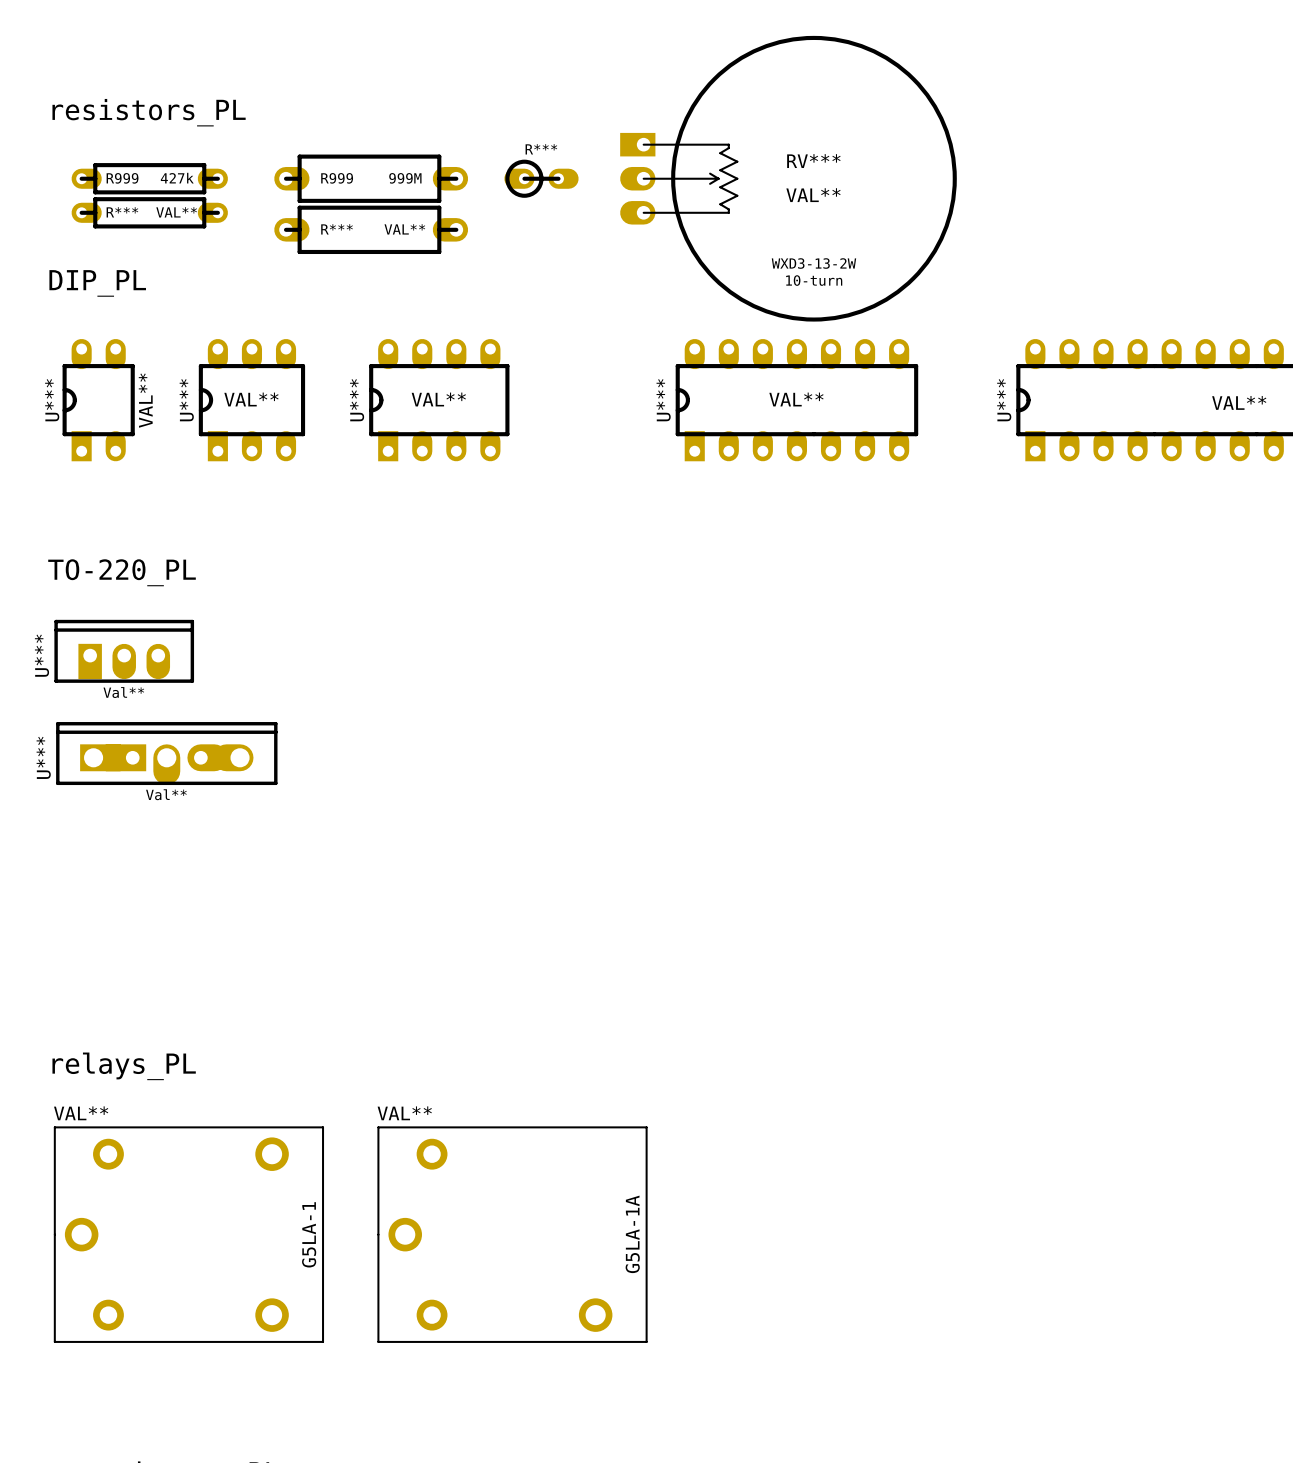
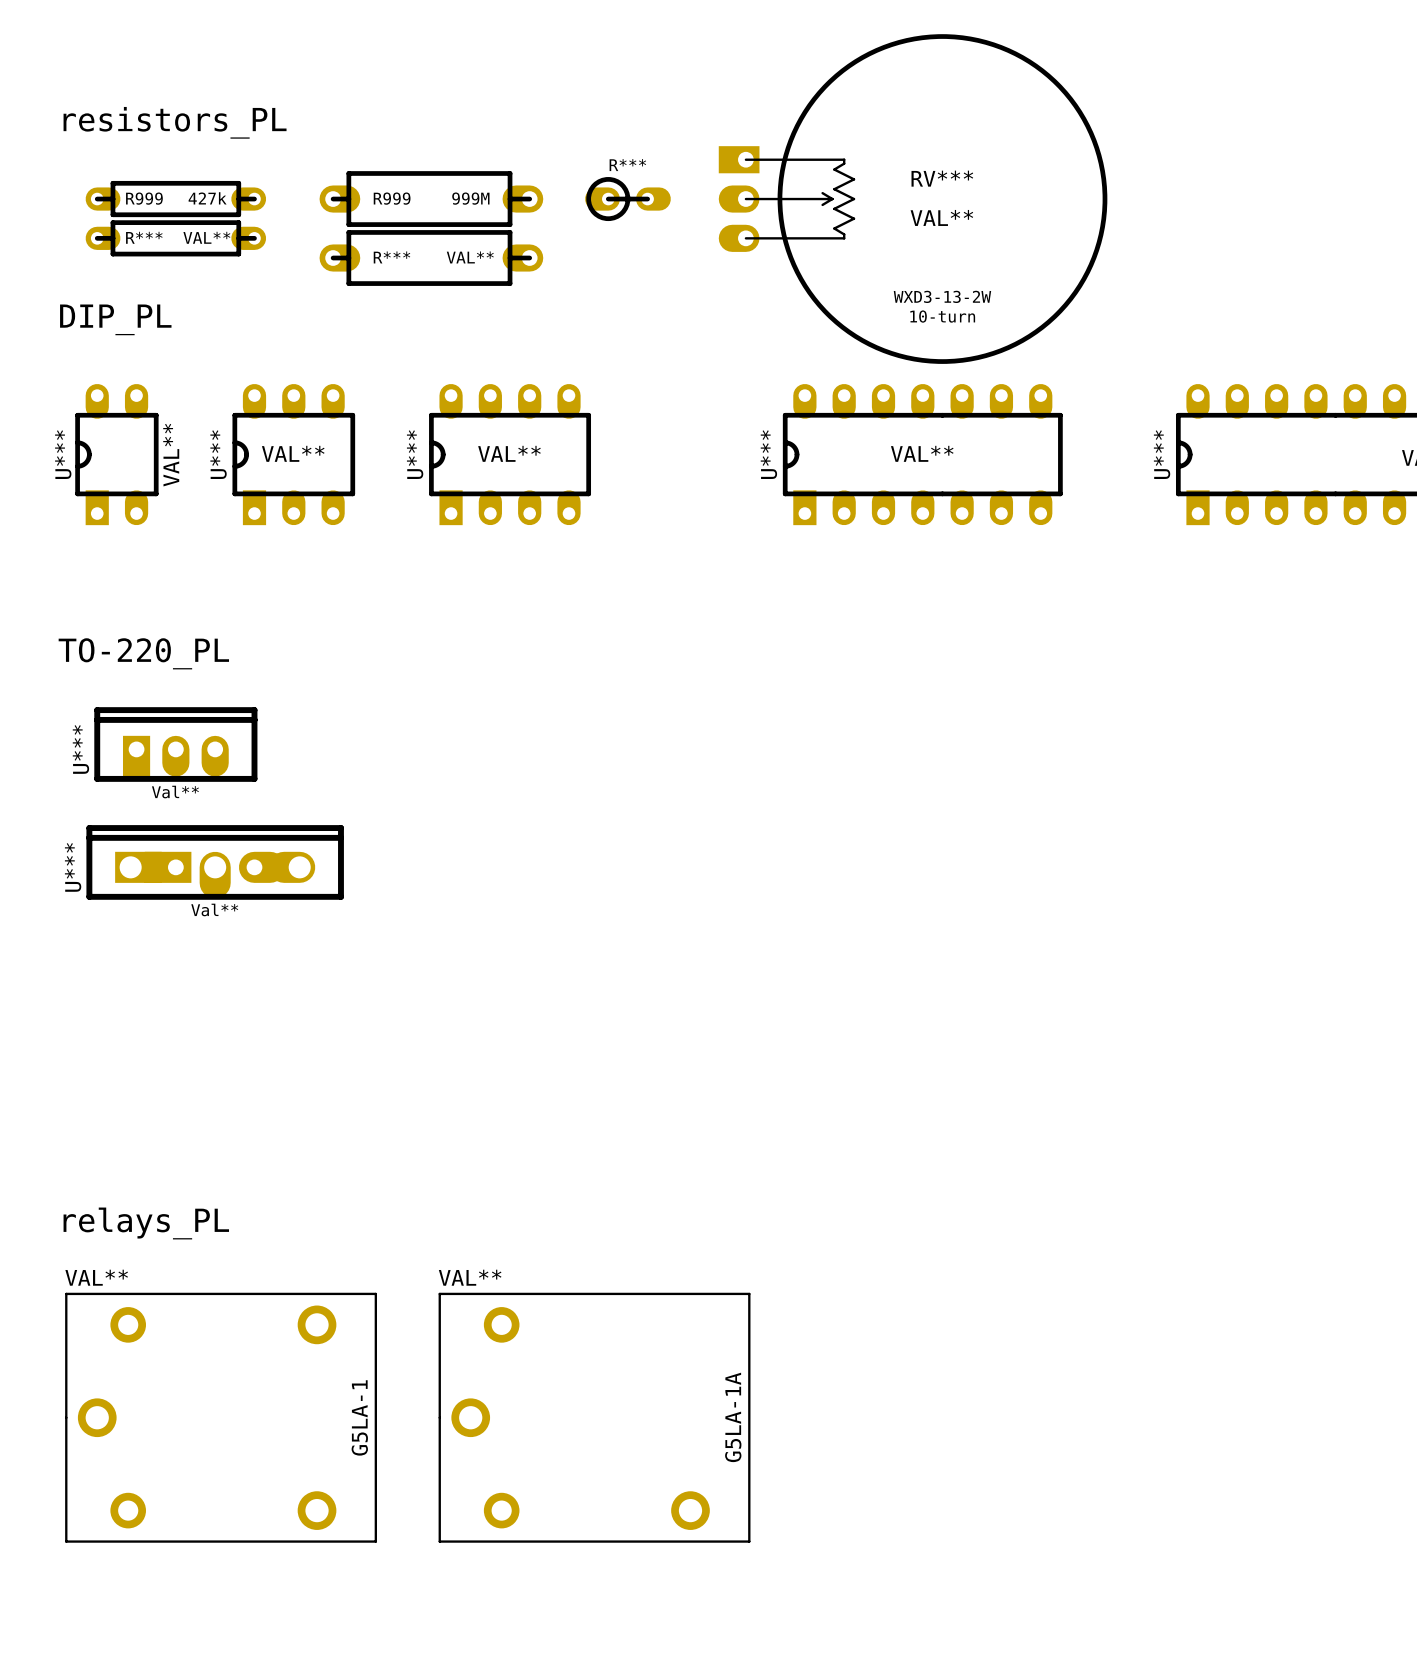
Val**: U*** (124, 651) -> none
Val**: none -> U*** (175, 744)
Val**: U*** (166, 753) -> none
Val**: none -> U*** (215, 862)

